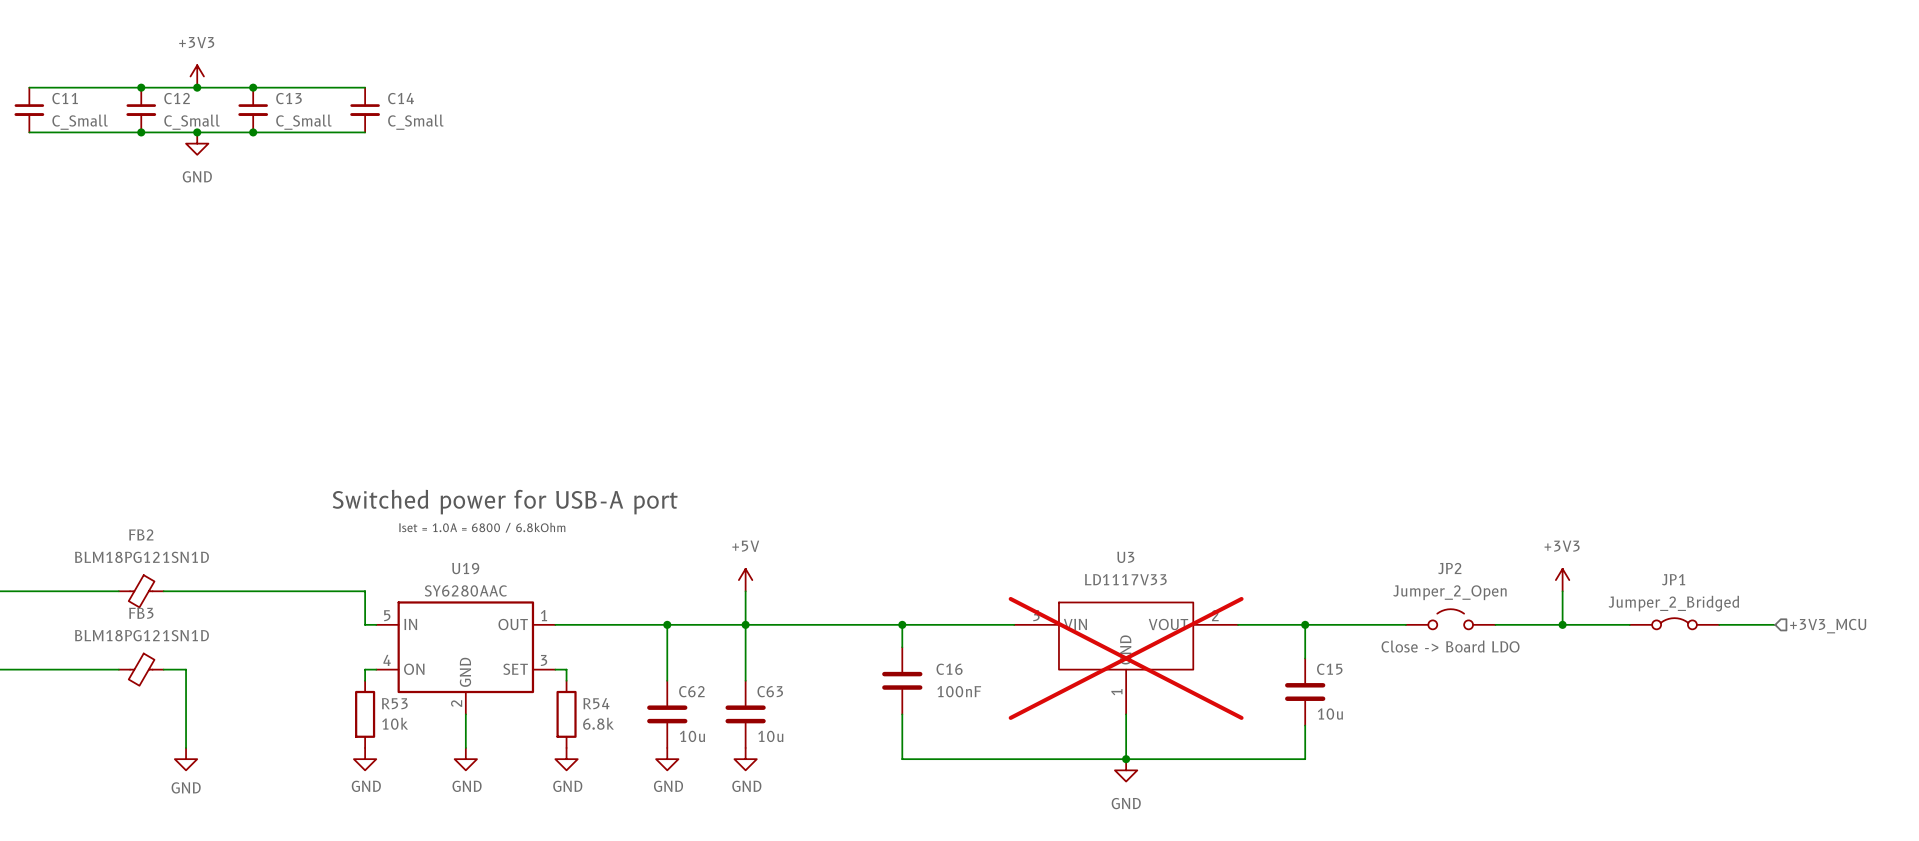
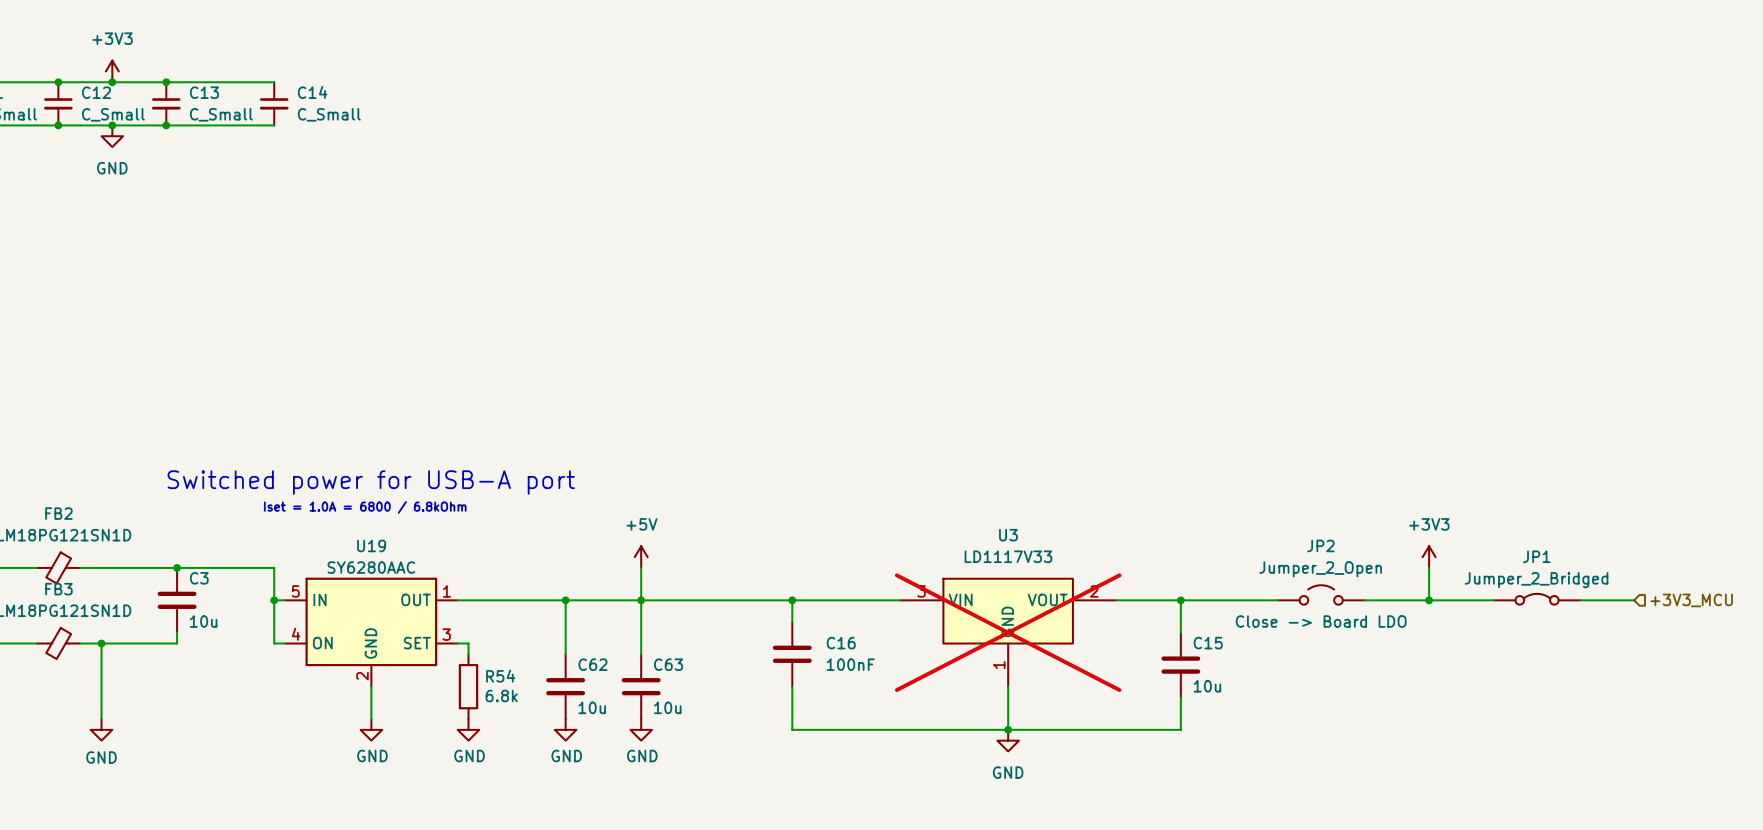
junction: none -> (177, 567)
C3: none -> 10u (177, 600)
junction: none -> (274, 600)
wire: none -> (177, 632) (177, 643) (101, 643)
junction: none -> (101, 643)
wire: (365, 669) (365, 680) -> (274, 643) (274, 600)
R53: 10k (365, 714) -> none
power symbol: GND (365, 759) -> none

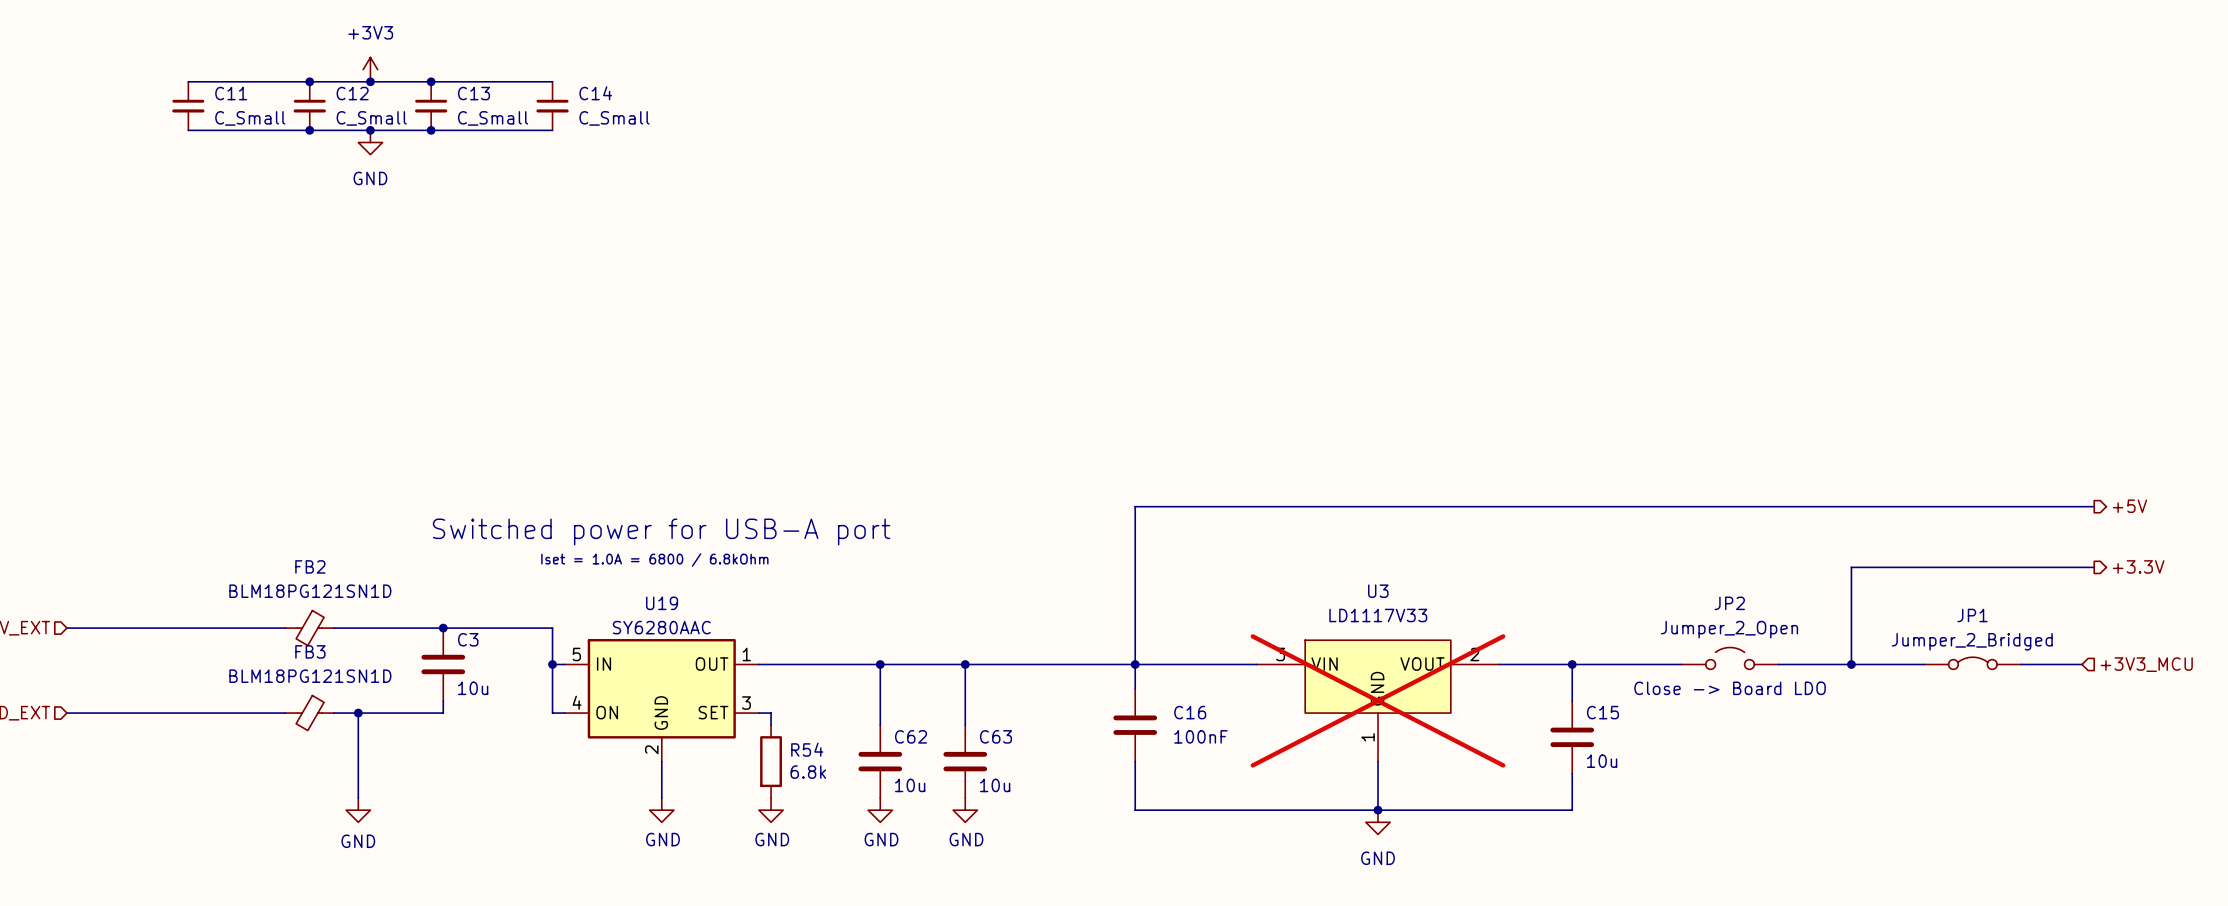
hierarchical label: none -> +5V (2129, 506)
wire: none -> (2094, 506) (1135, 506) (1135, 664)
wire: none -> (2094, 567) (1851, 567) (1851, 628)
hierarchical label: none -> +3.3V (2138, 566)
power symbol: +5V (641, 557) -> none
power symbol: +3V3 (1429, 557) -> none
wire: (641, 567) (641, 600) -> none

